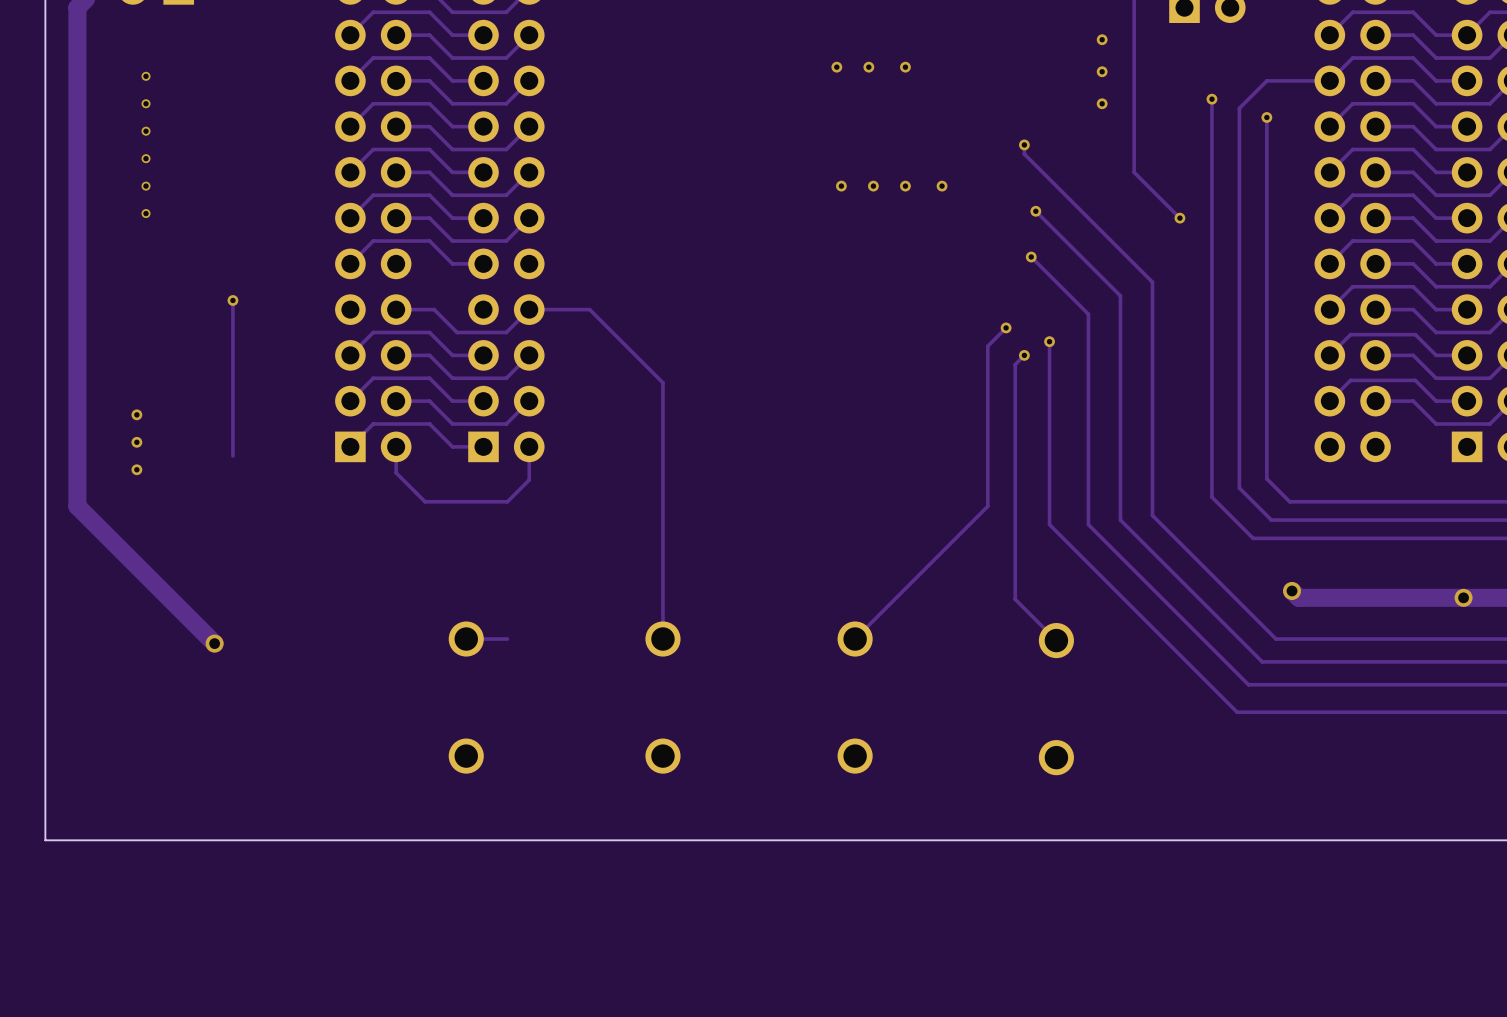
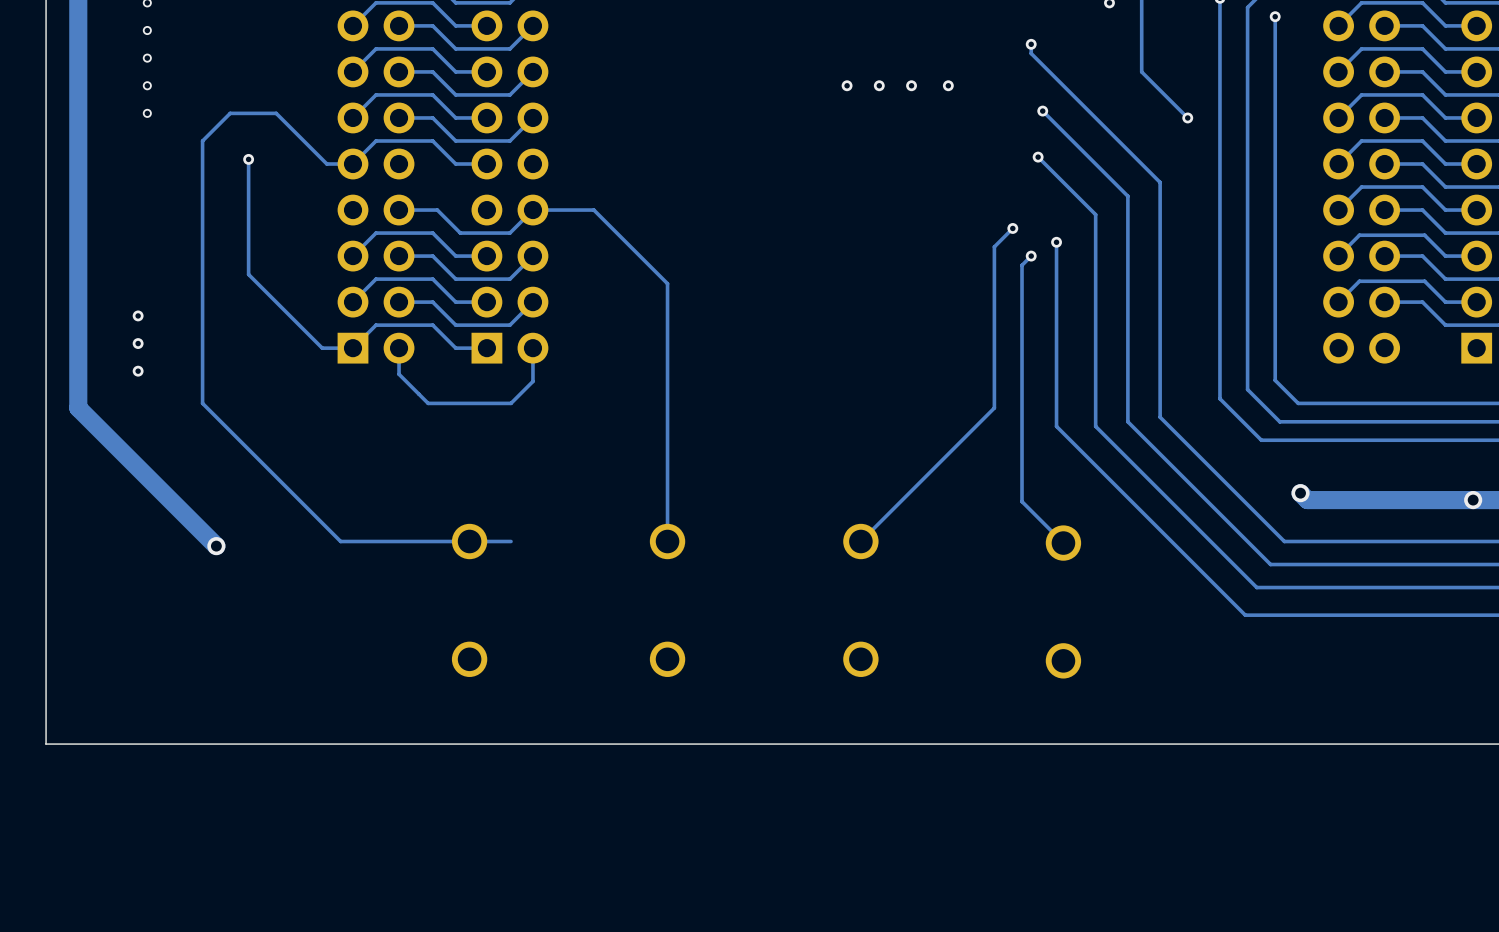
track: none -> (248, 159) (248, 274) (322, 348) (353, 348)
track: none -> (353, 164) (326, 164) (276, 113) (230, 113) (202, 140) (202, 403) (340, 541) (469, 541)
track: (232, 300) (232, 456) -> none
via position: (232, 300) -> (248, 159)

